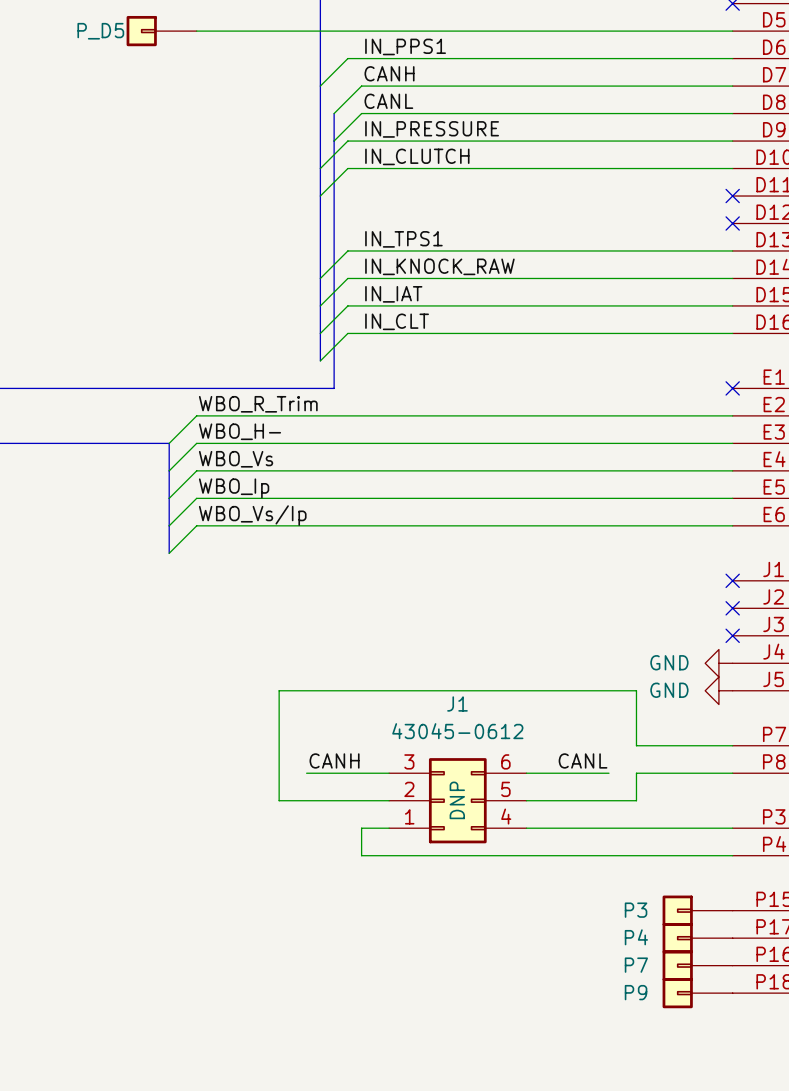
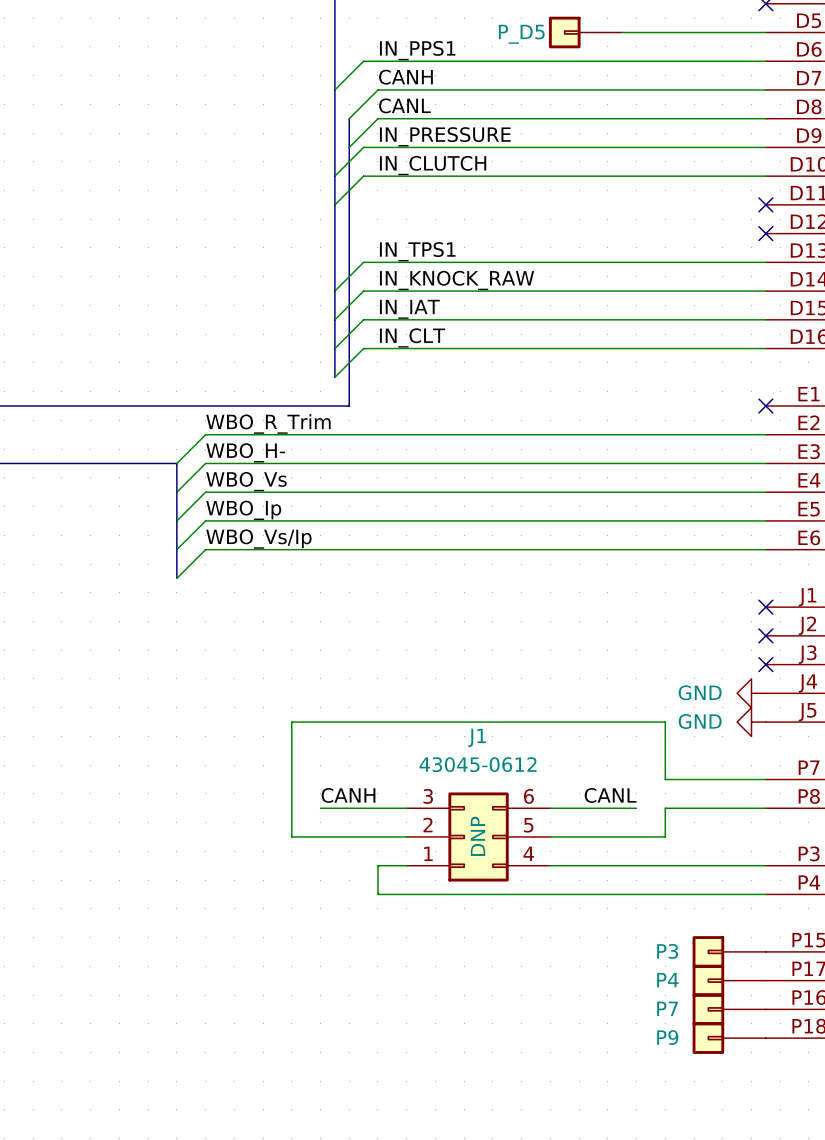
P_D5 position: (161, 31) -> (585, 32)
wire: (196, 31) (595, 31) -> none

